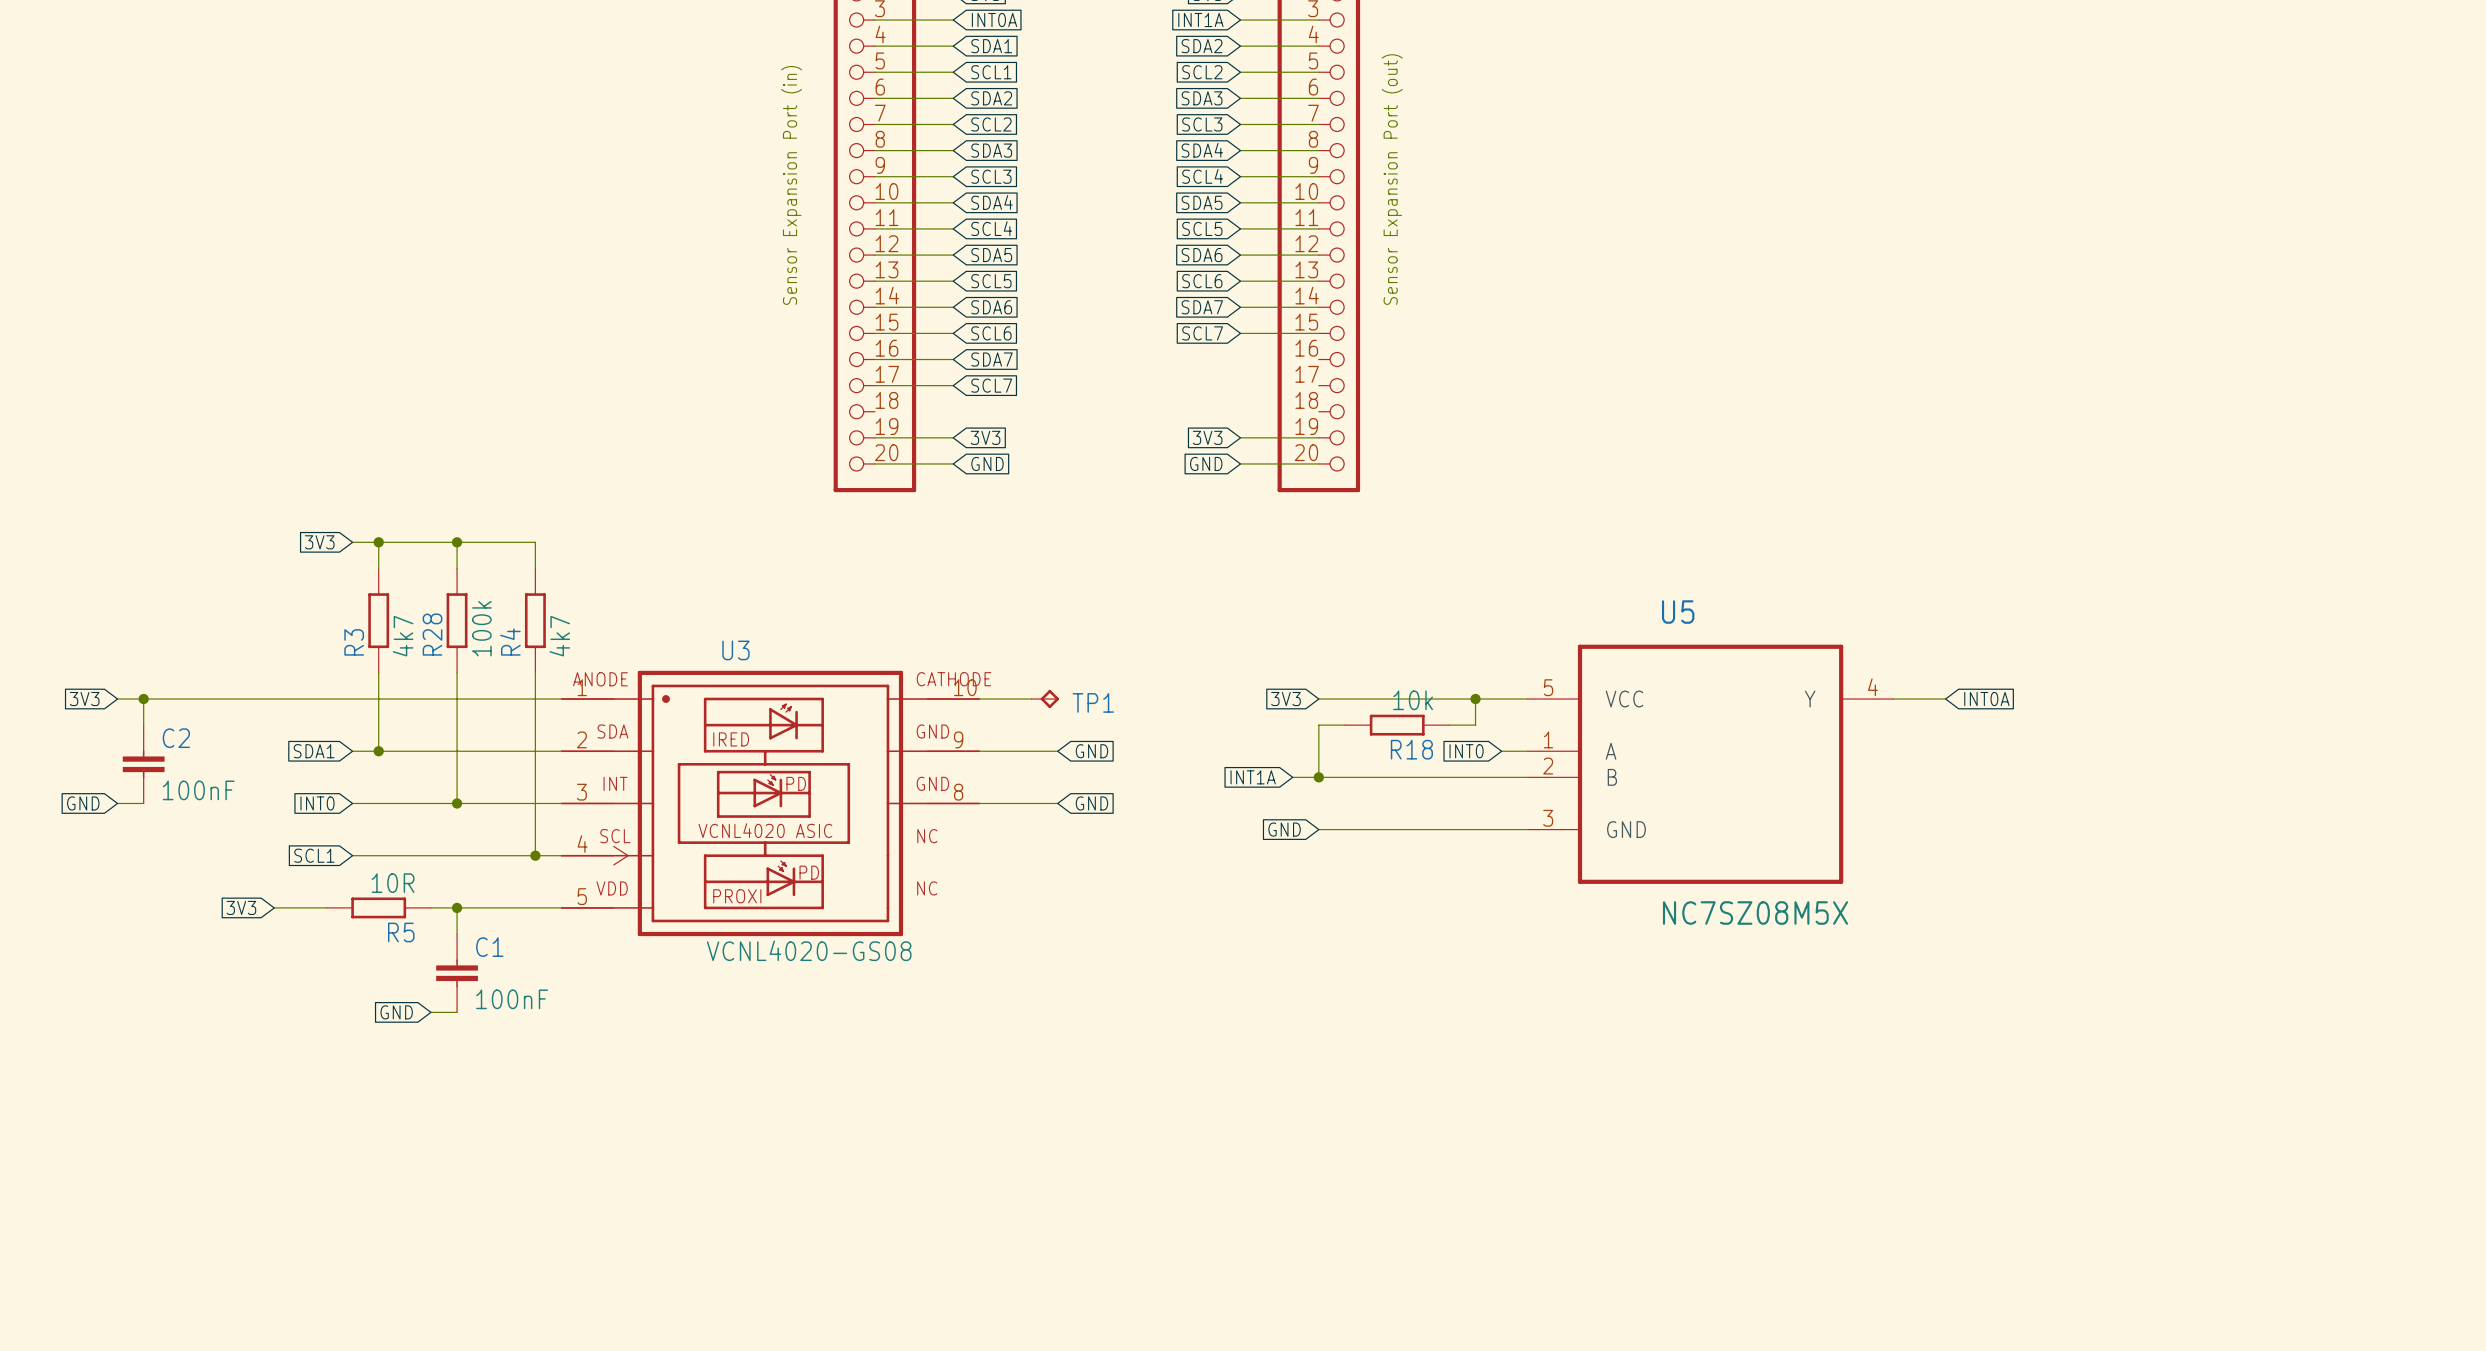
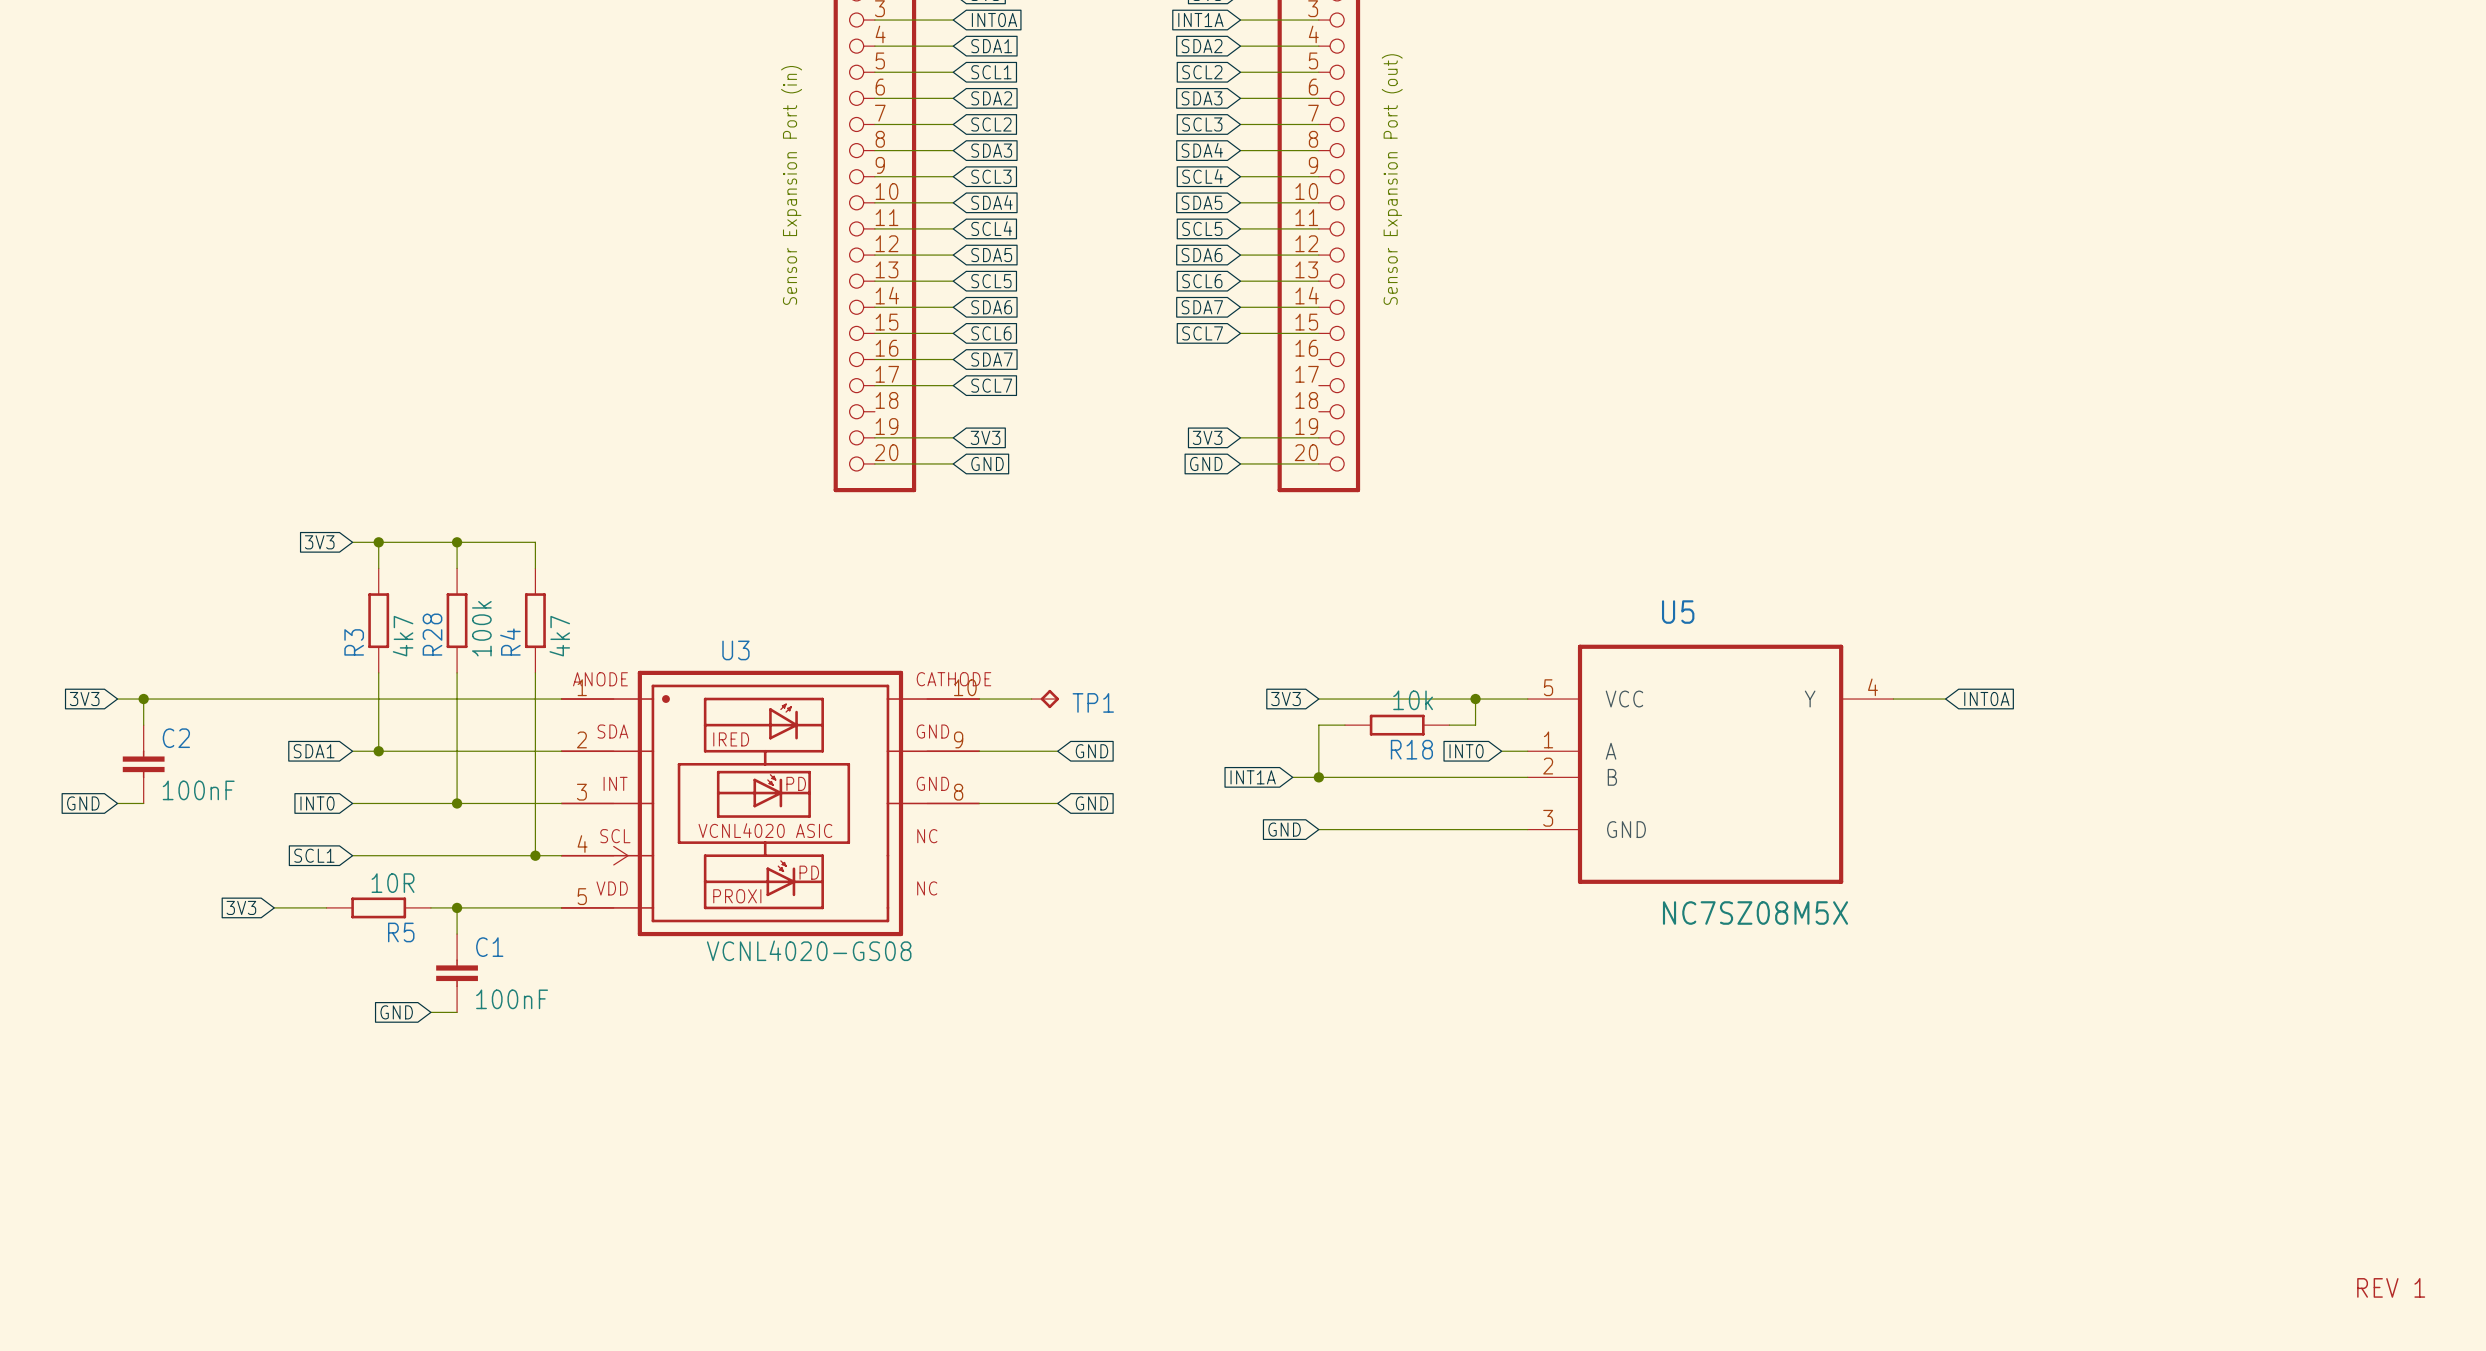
text: none -> REV 1 (2391, 1287)

